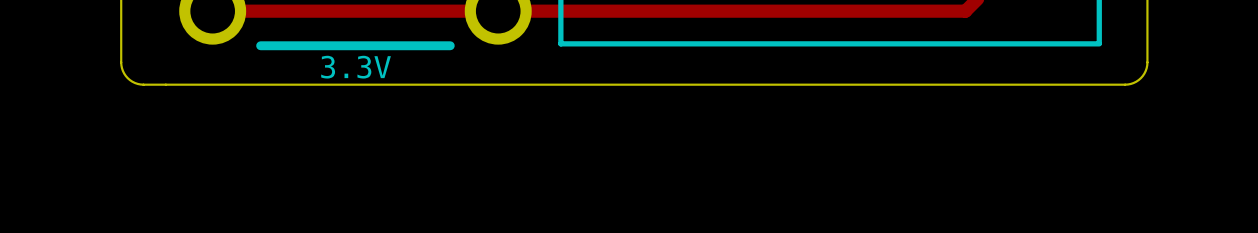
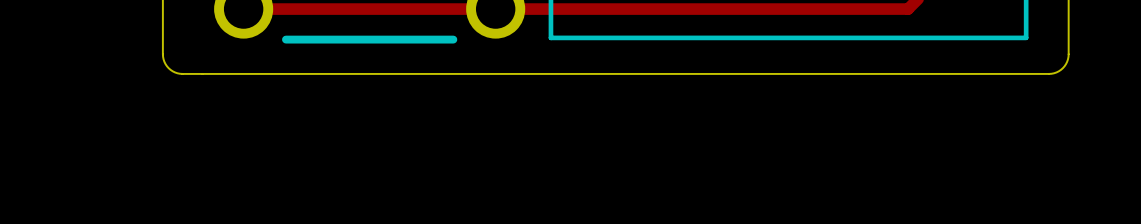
text: 3.3V (356, 67) -> none

